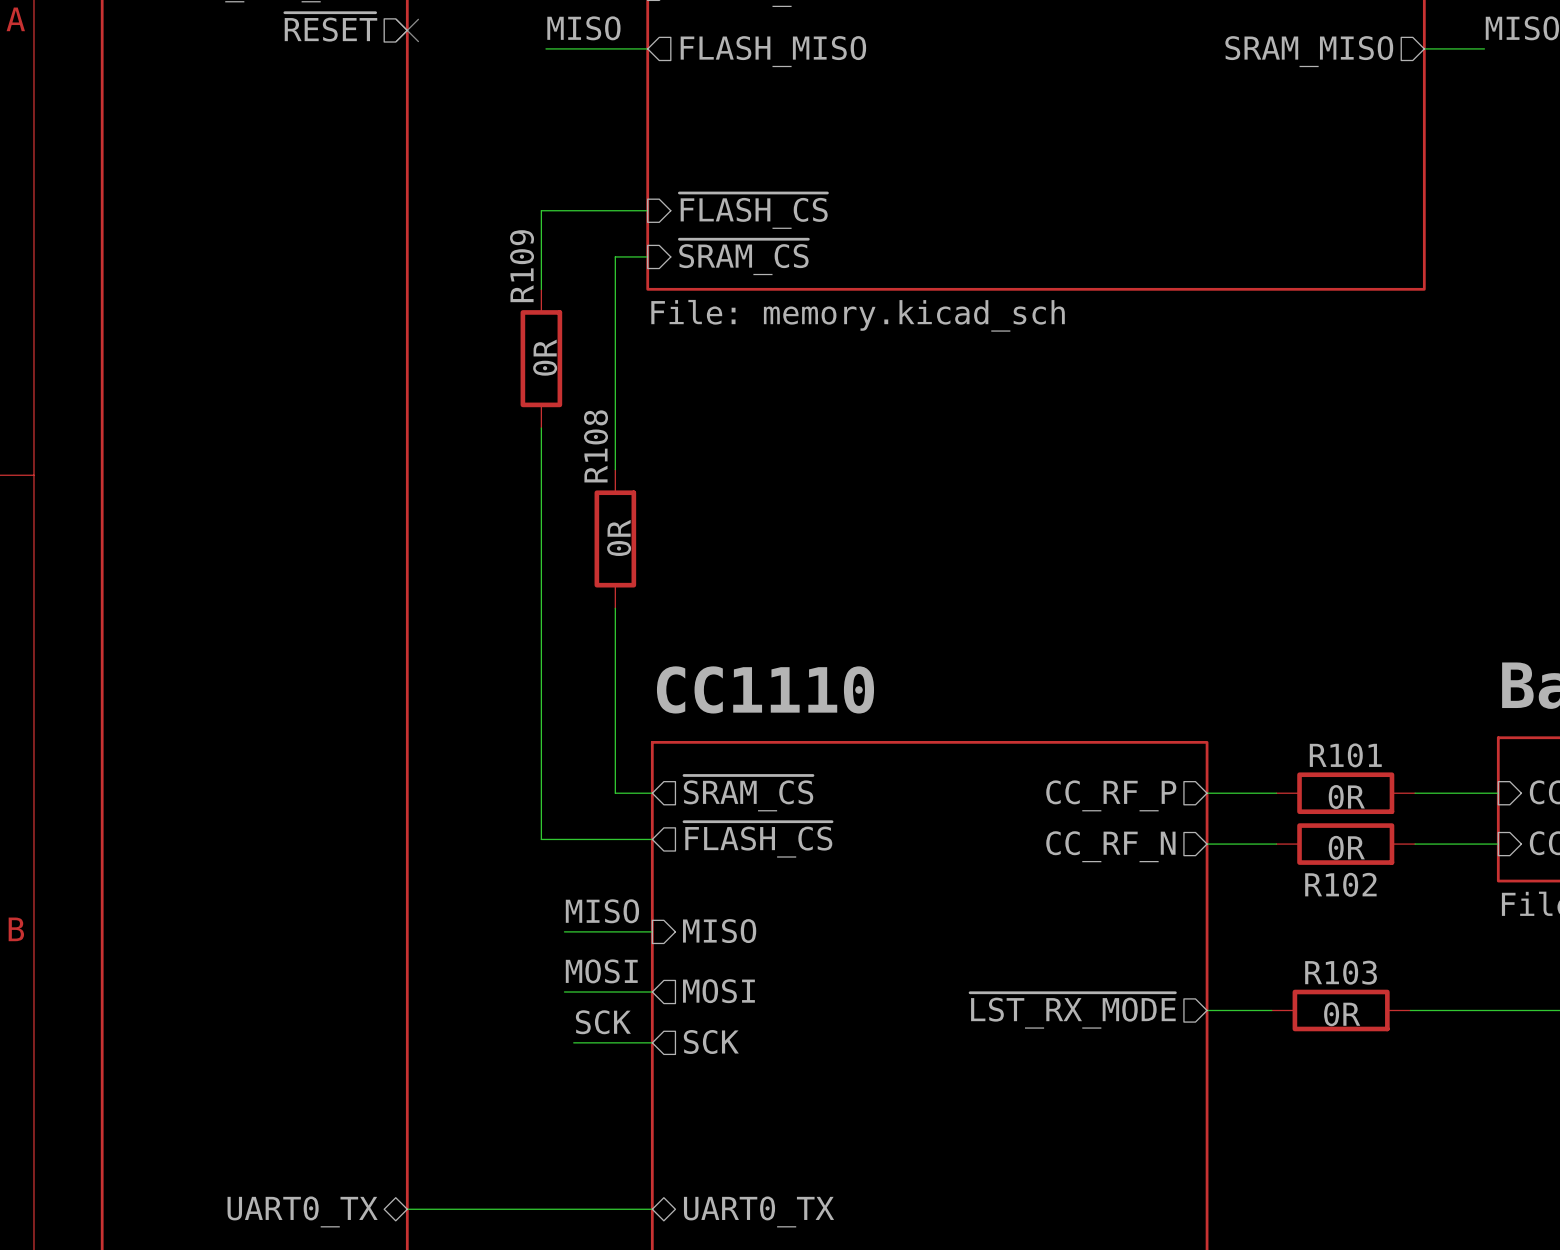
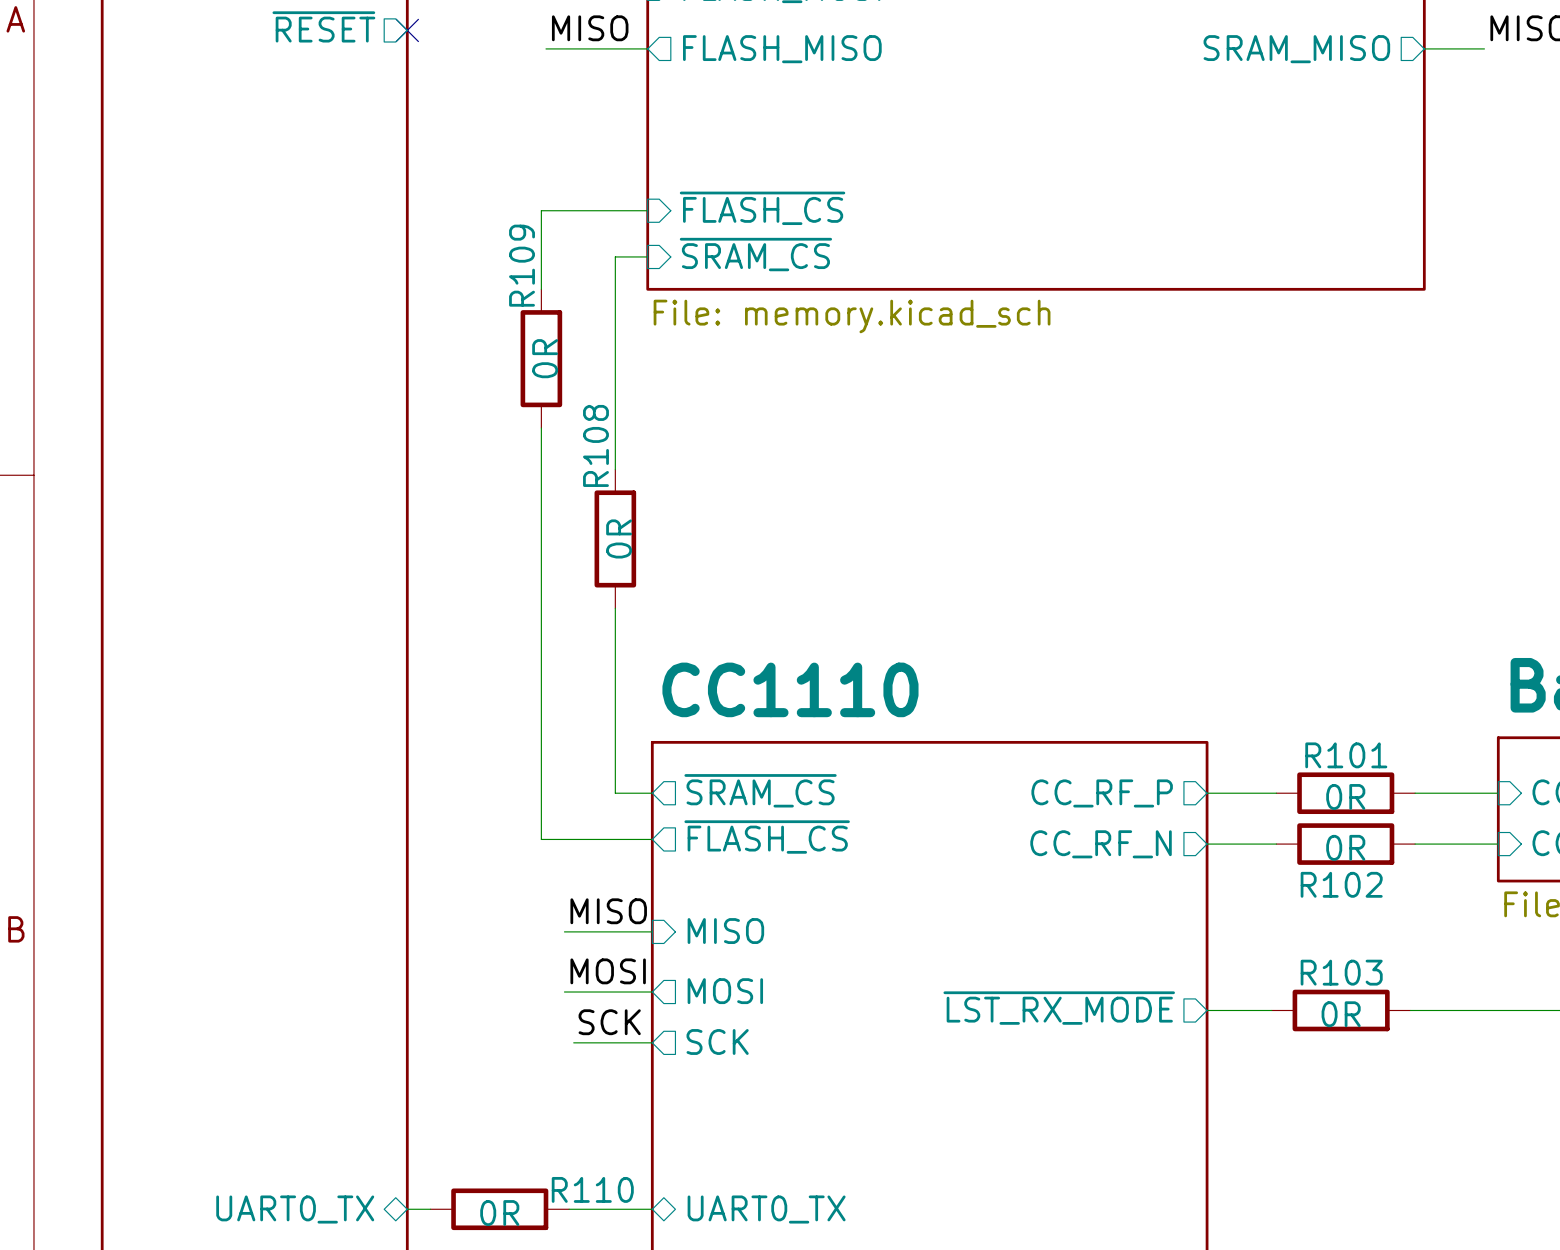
wire: (430, 1209) (569, 1209) -> none
R110: none -> 0R (499, 1209)

